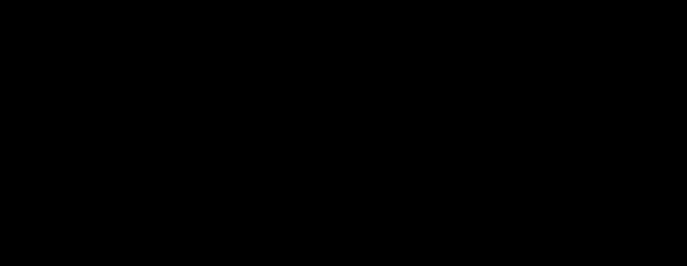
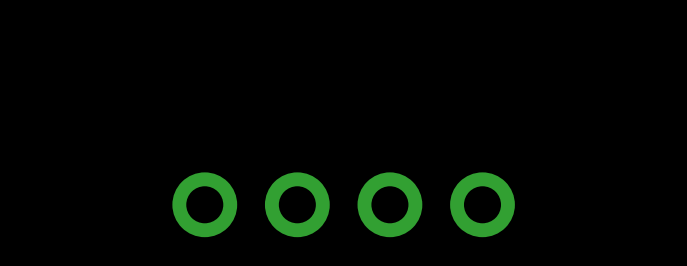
part: none -> (343, 204)

